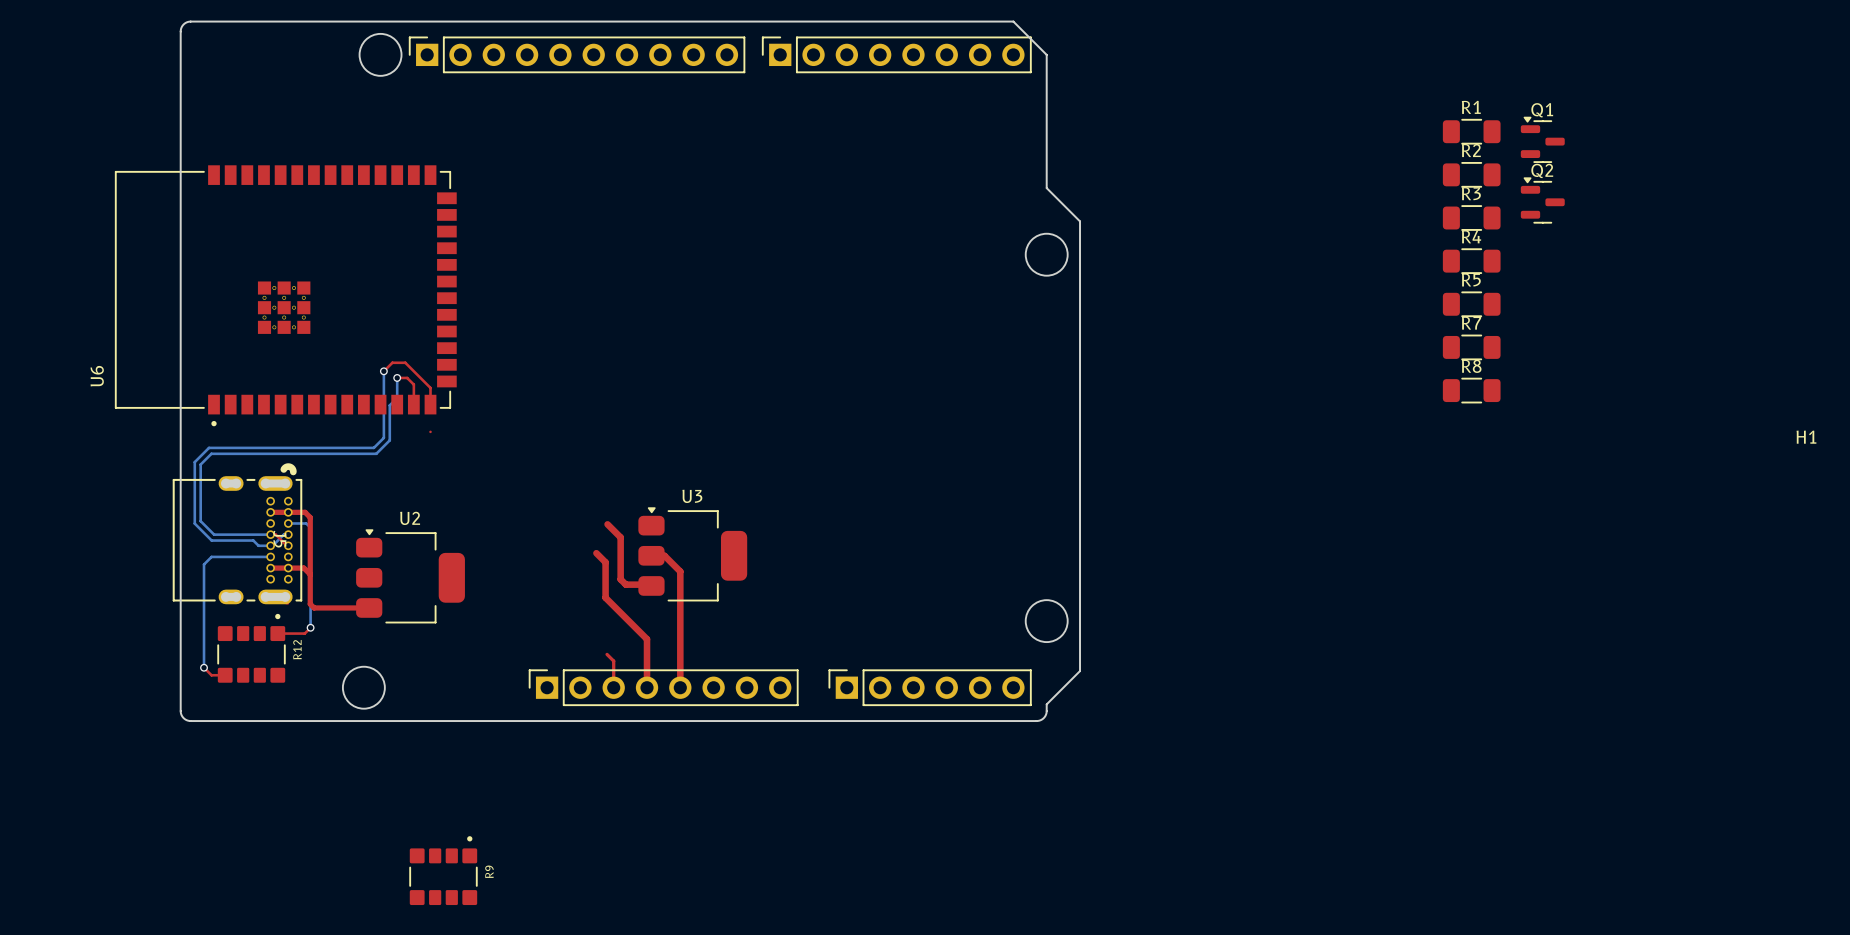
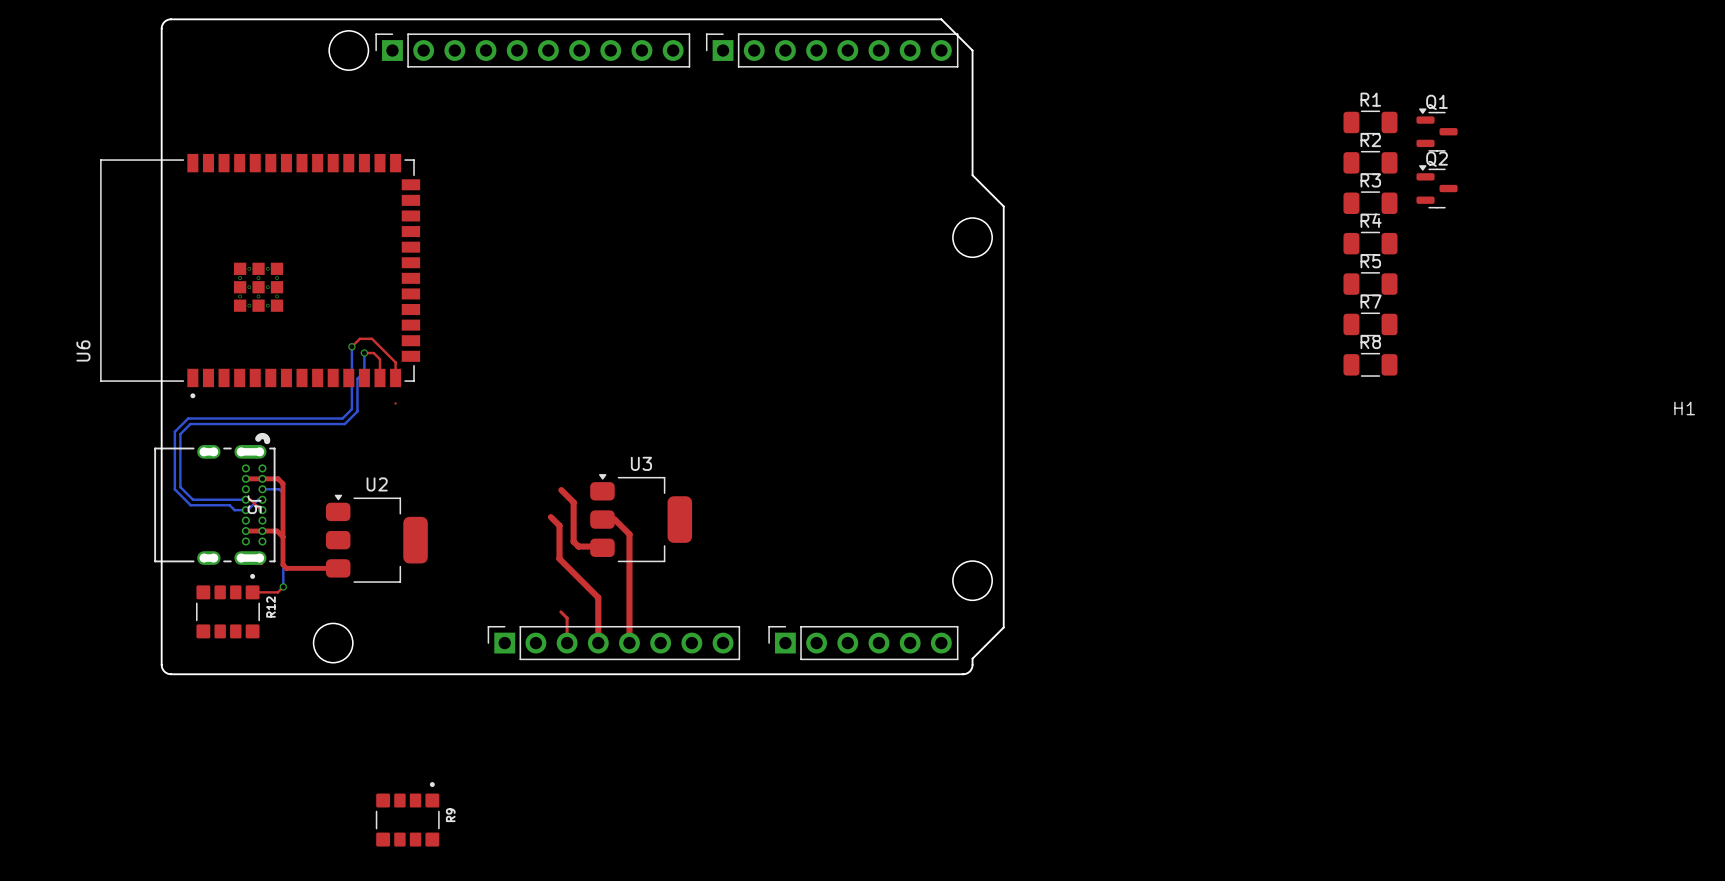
bottom track: (270, 556) (211, 556) (204, 564) (204, 667) -> none
top track: (204, 667) (211, 675) (225, 675) -> none
via: (204, 667) -> none

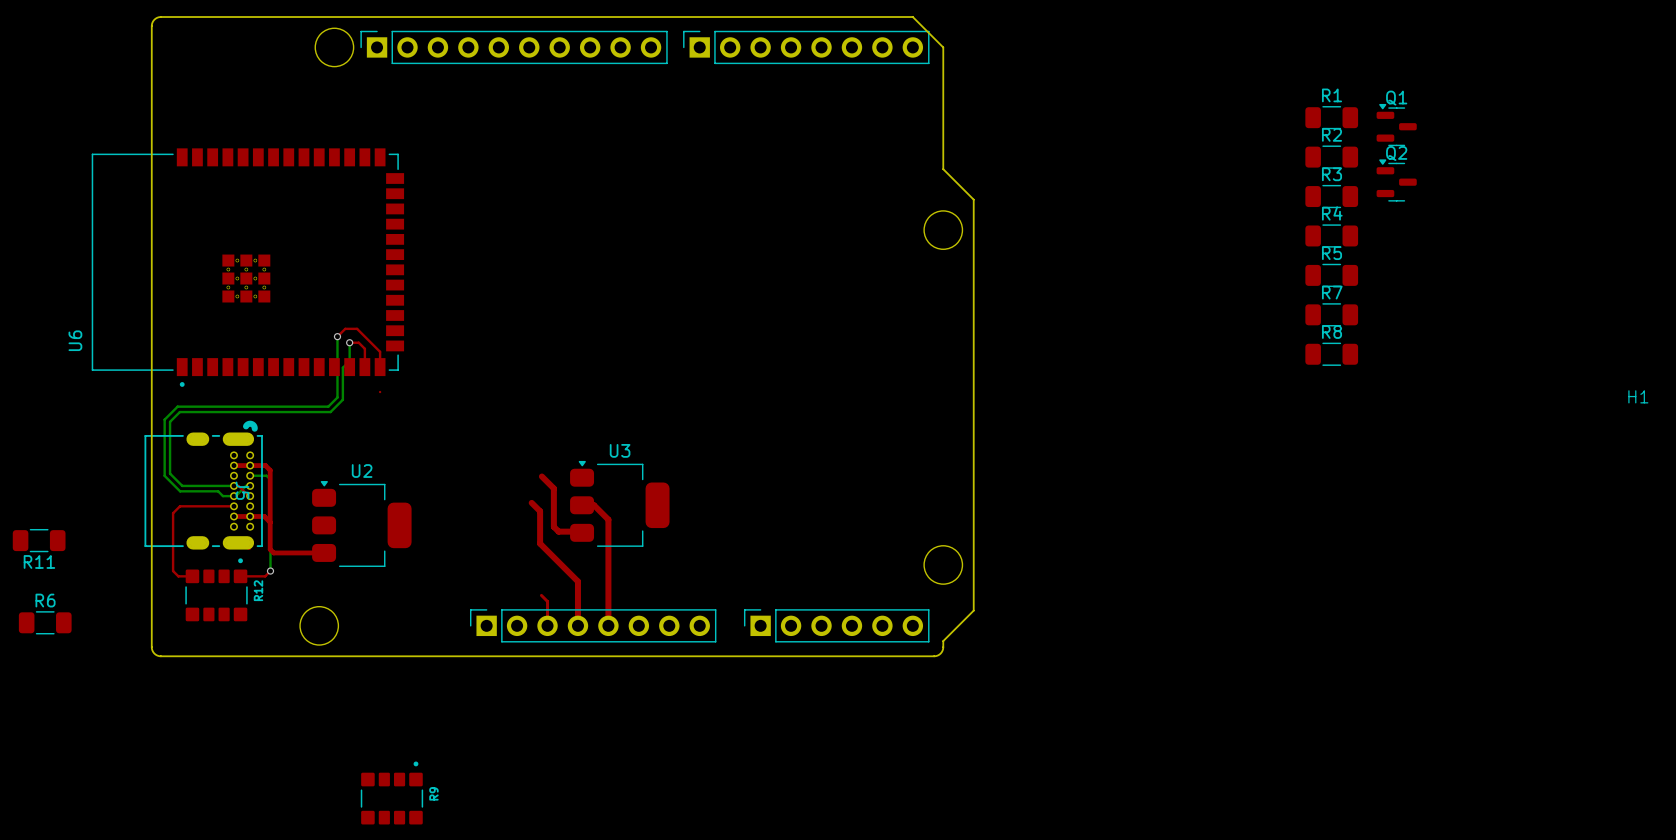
top track: none -> (233, 506) (179, 506) (173, 513) (173, 571) (178, 576) (192, 576)
R11: none -> (39, 540)
R6: none -> (45, 622)

